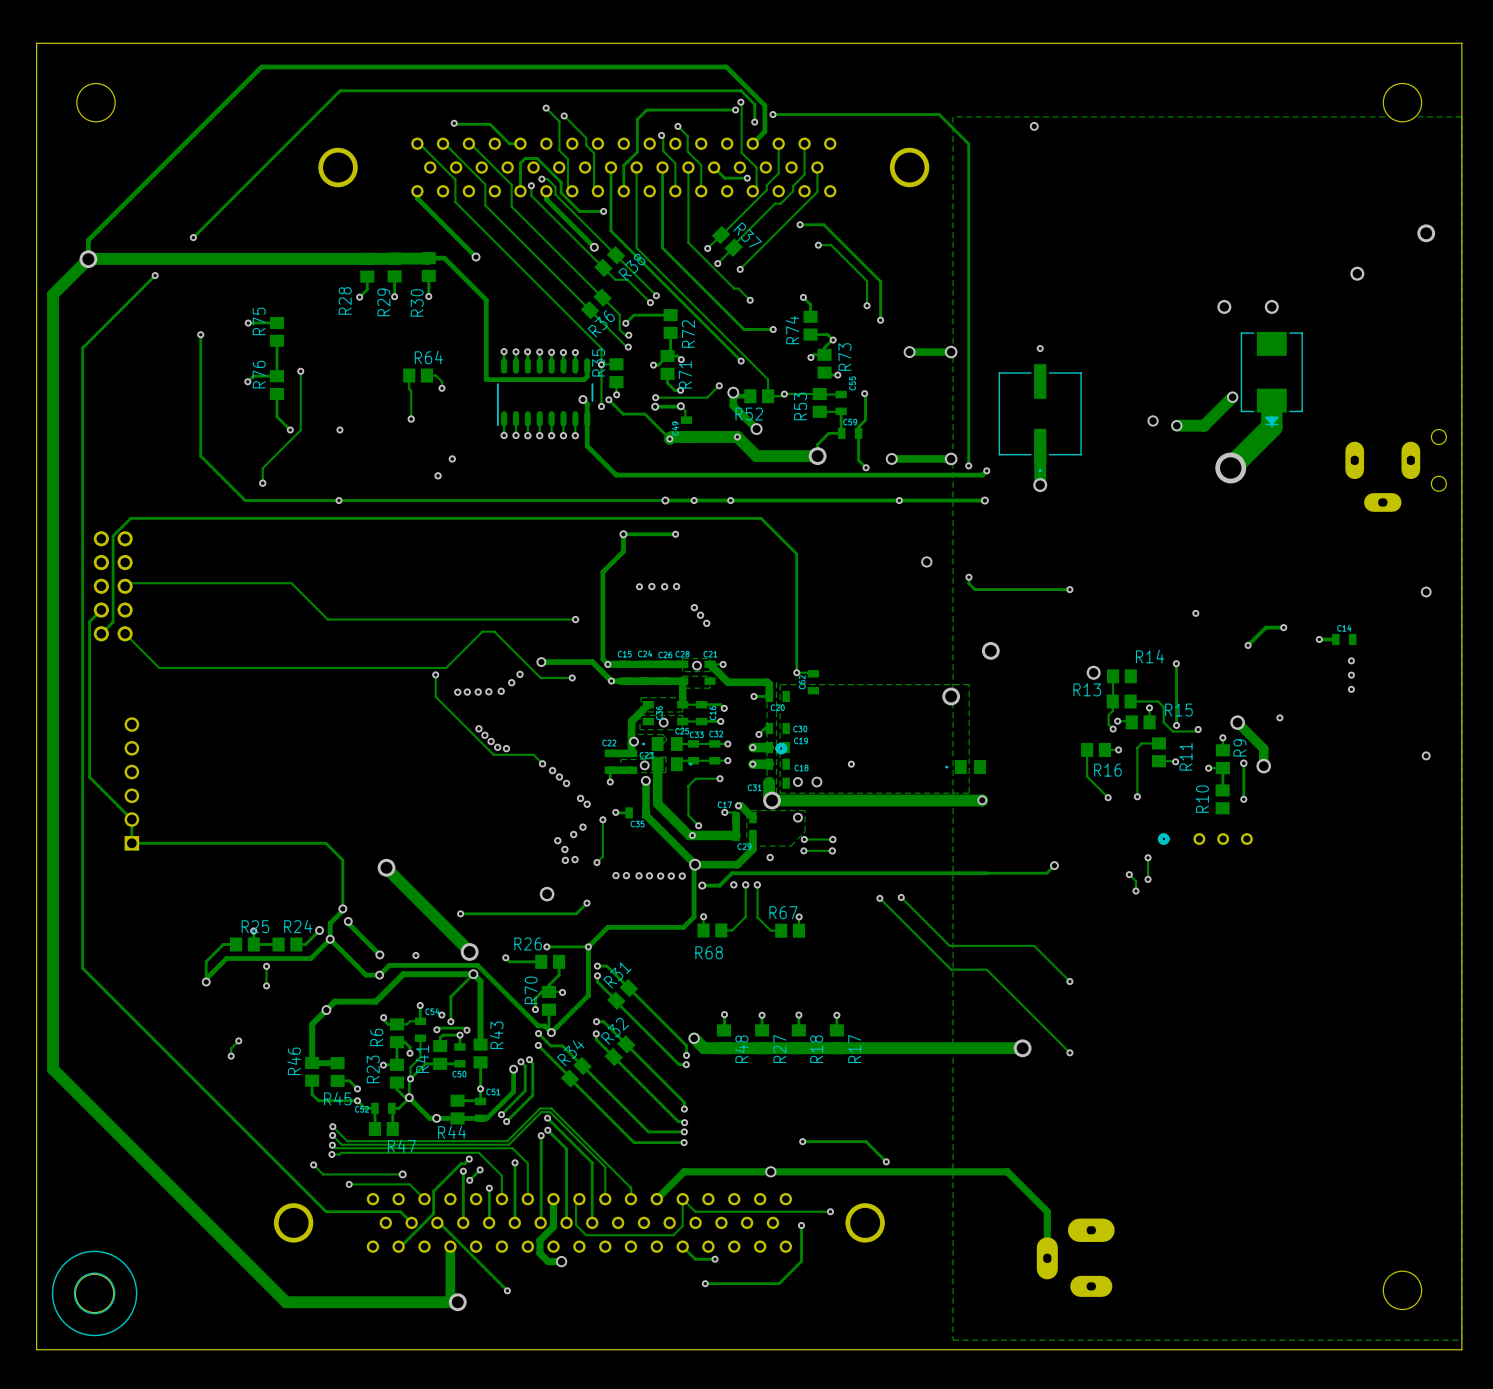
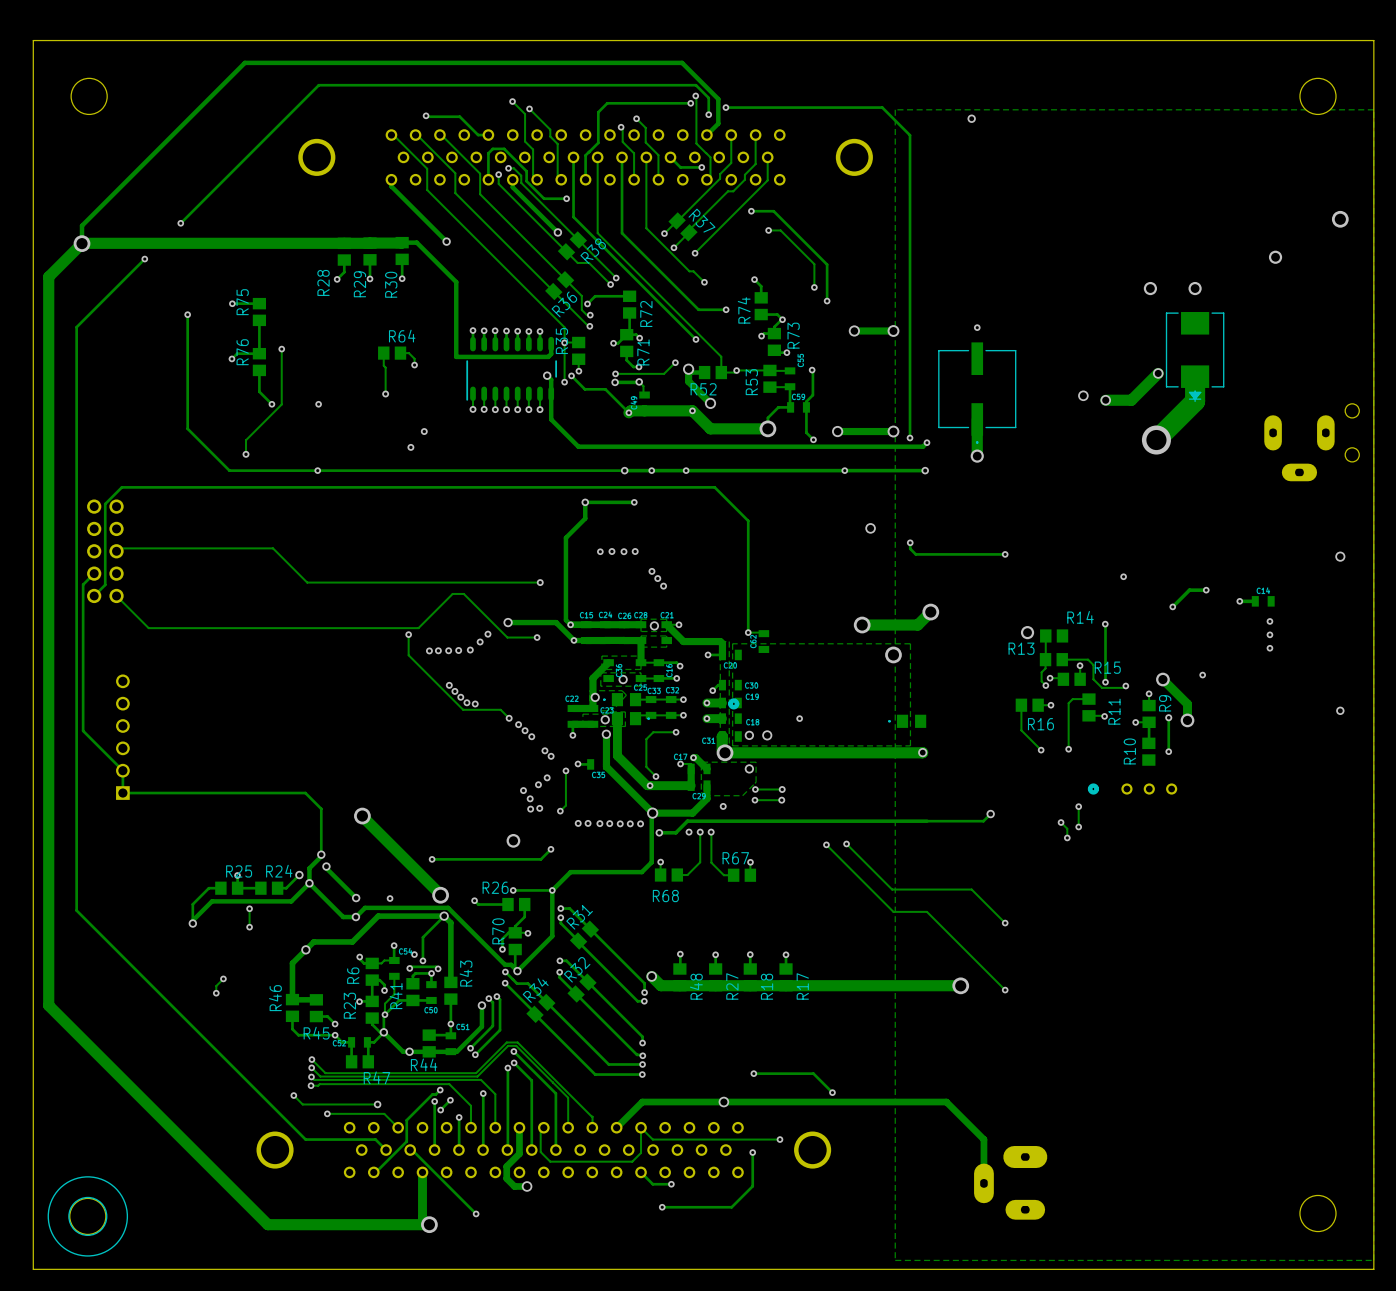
track: none -> (930, 612) (917, 625) (862, 625)
via: none -> (862, 625)

